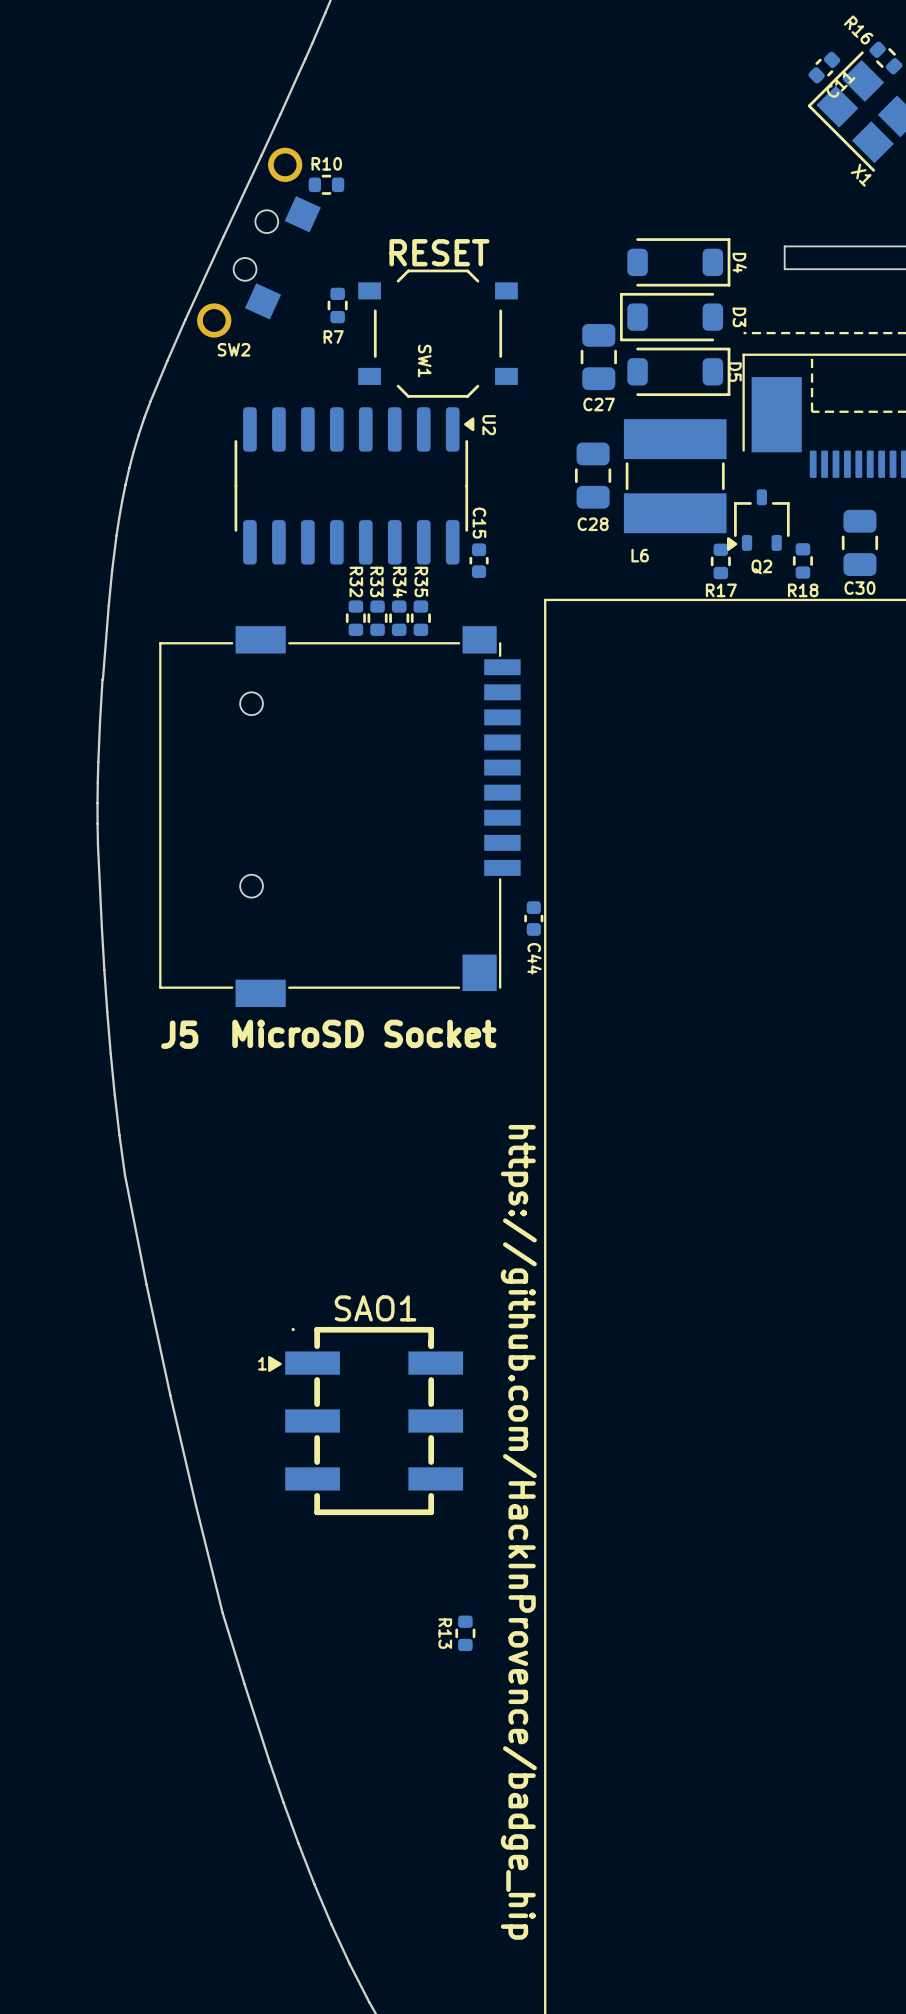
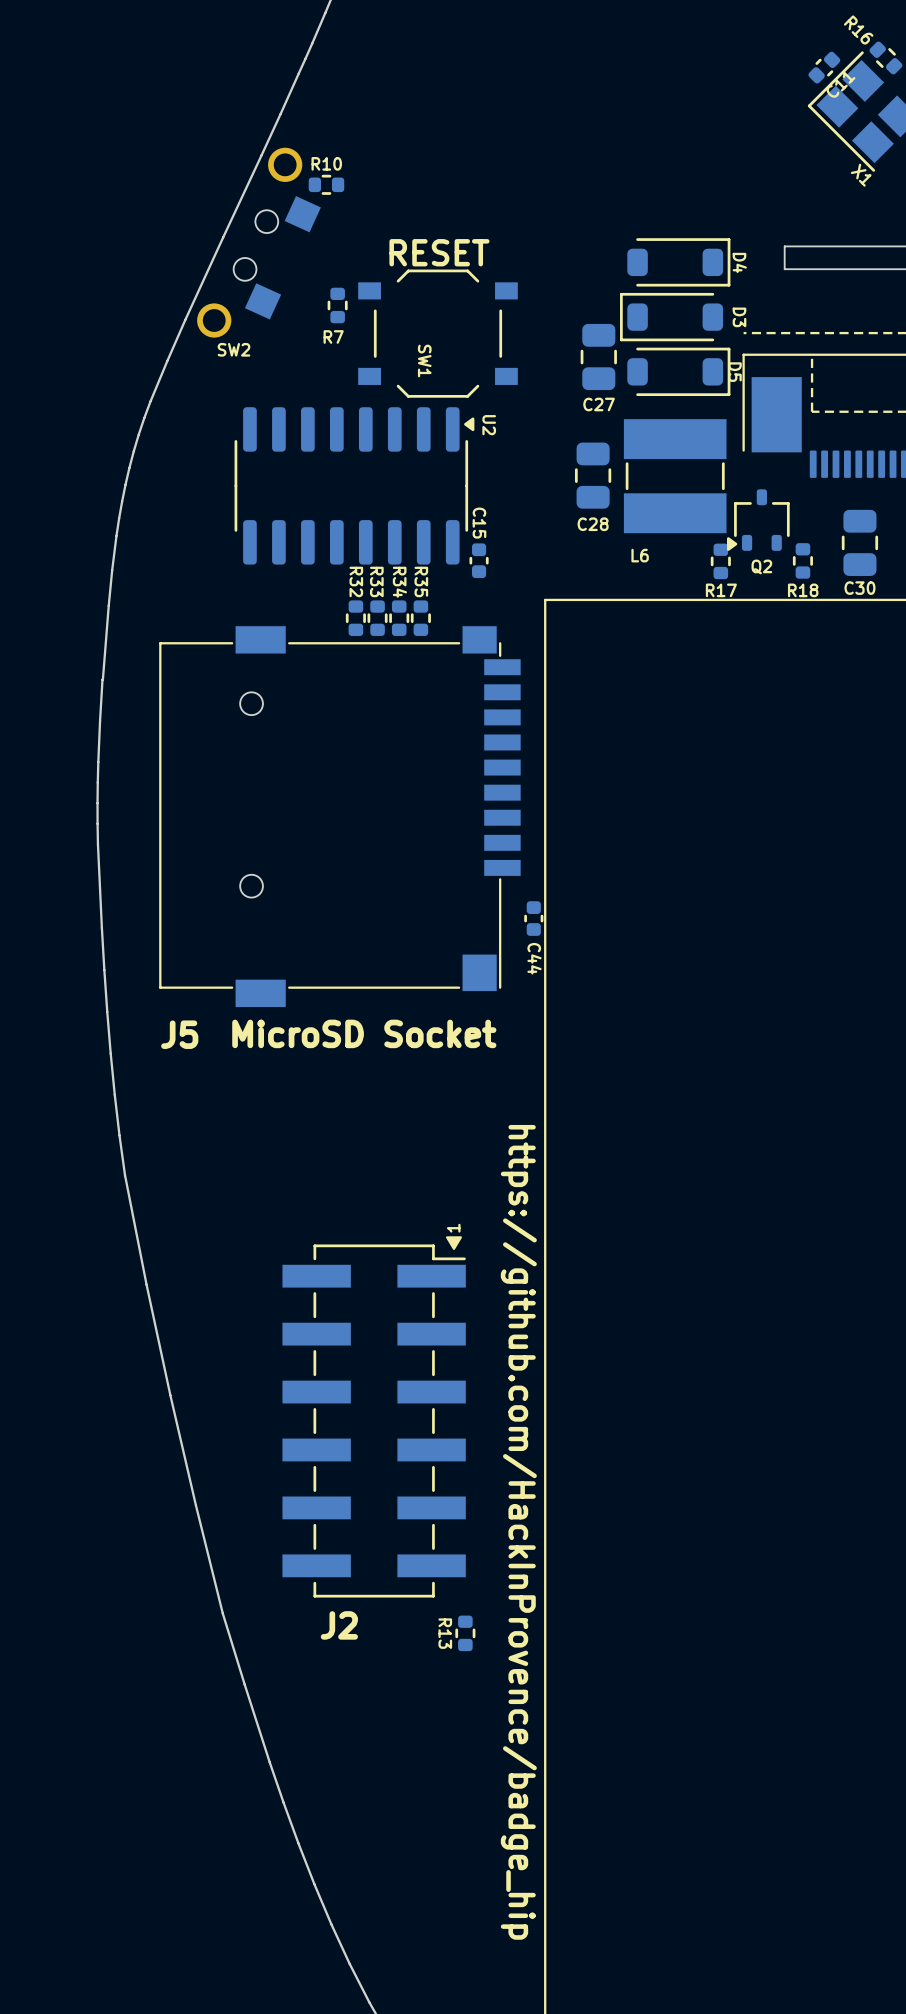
drawing: none -> [445, 1236, 462, 1250]
drawing: [268, 1356, 282, 1372] -> none
text rotation: 0° (262, 1363) -> 90° counterclockwise (453, 1228)
text position: 1 (262, 1363) -> 1 (453, 1228)
SAO1: (374, 1421) -> none
J2: none -> (374, 1421)

